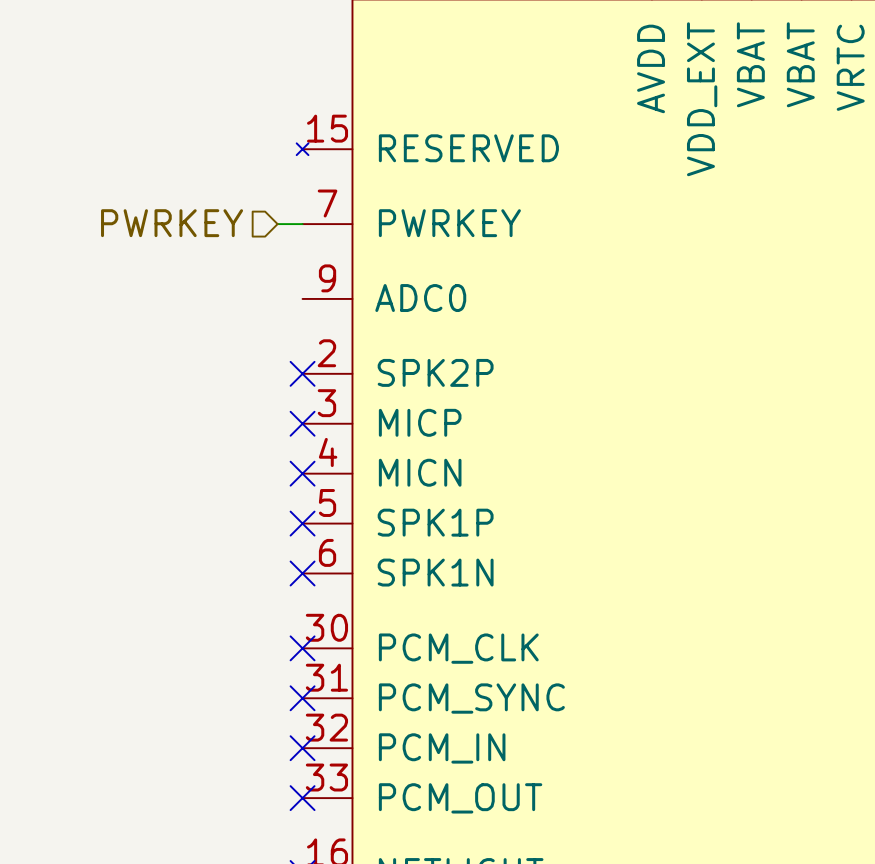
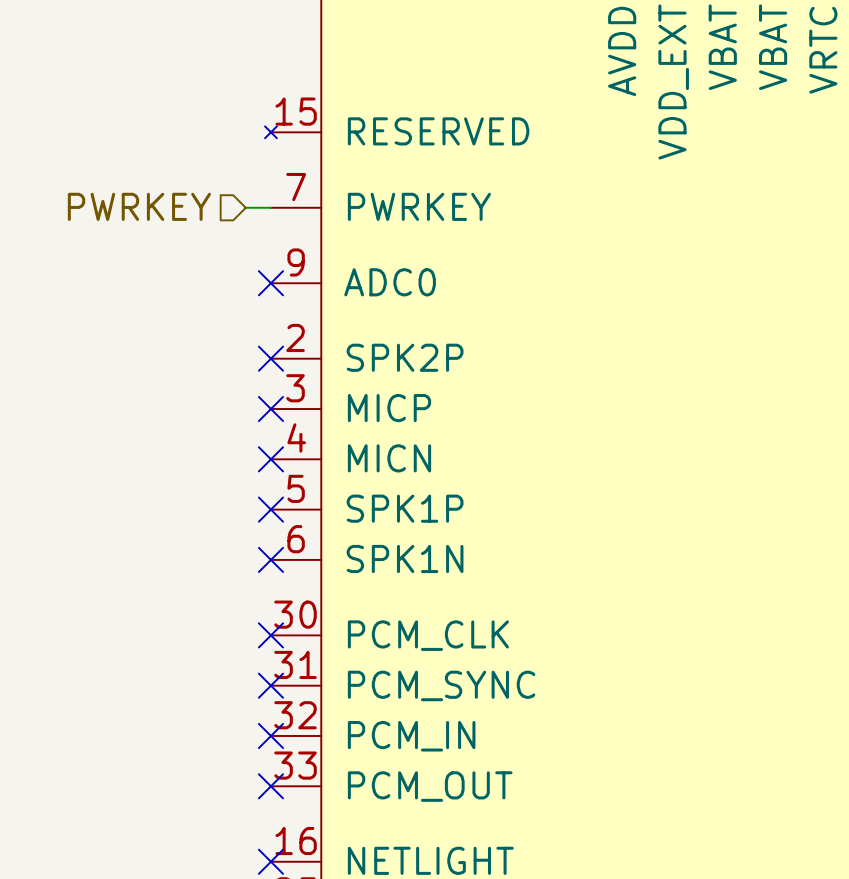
no-connect mark: none -> (270, 283)

